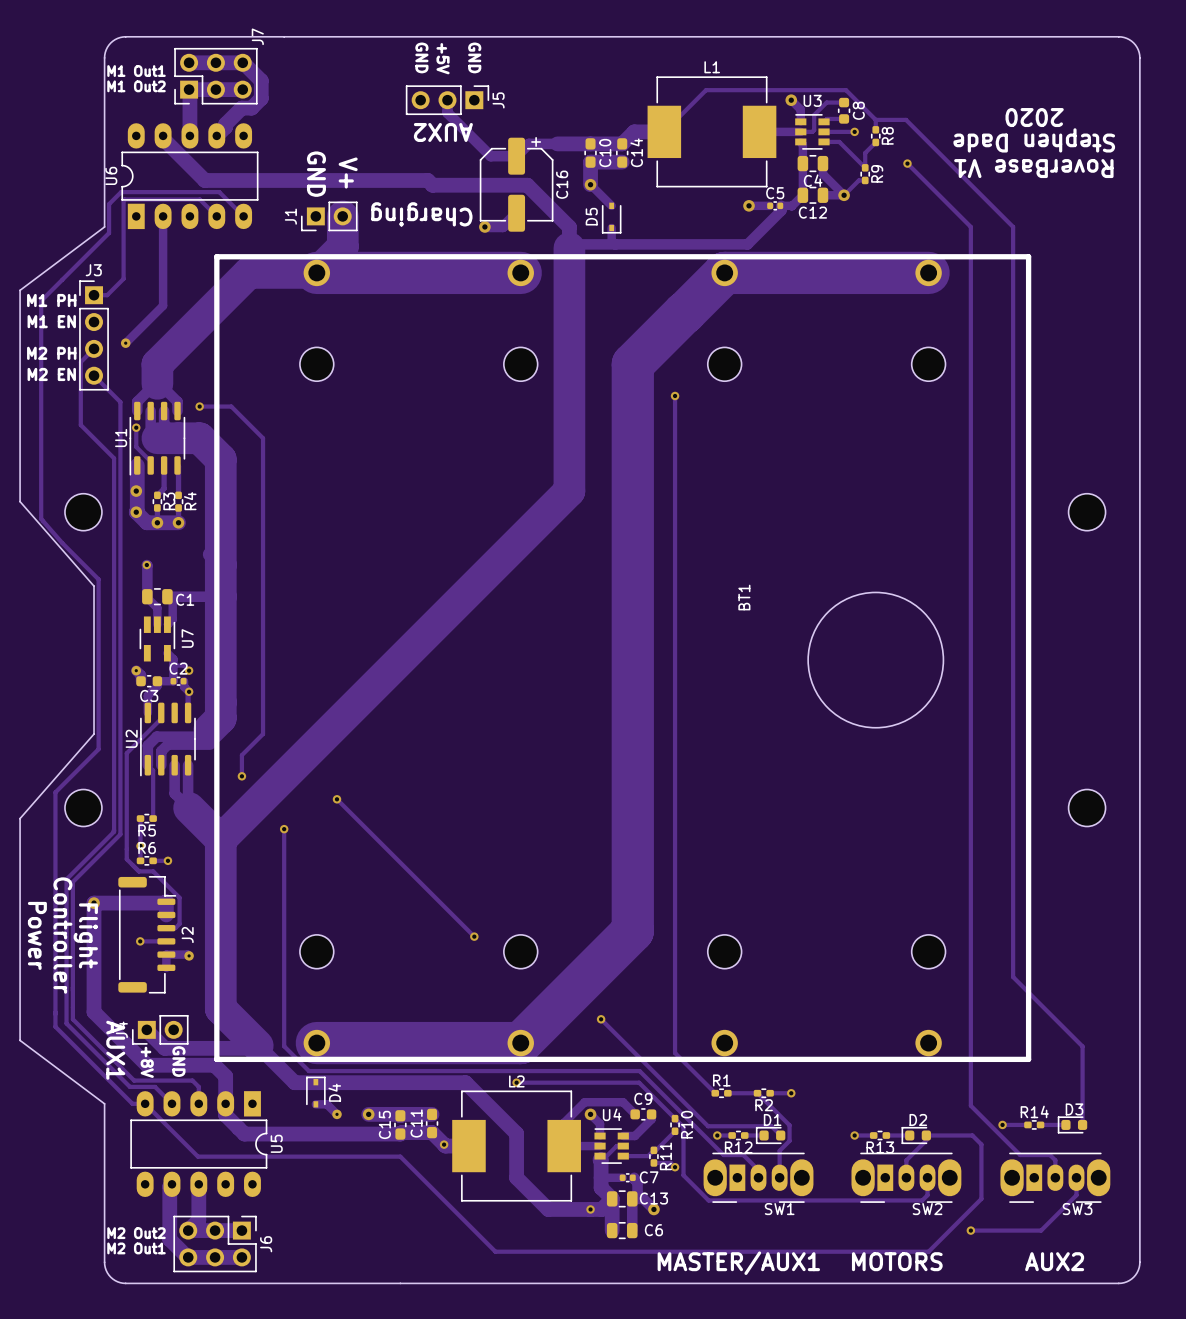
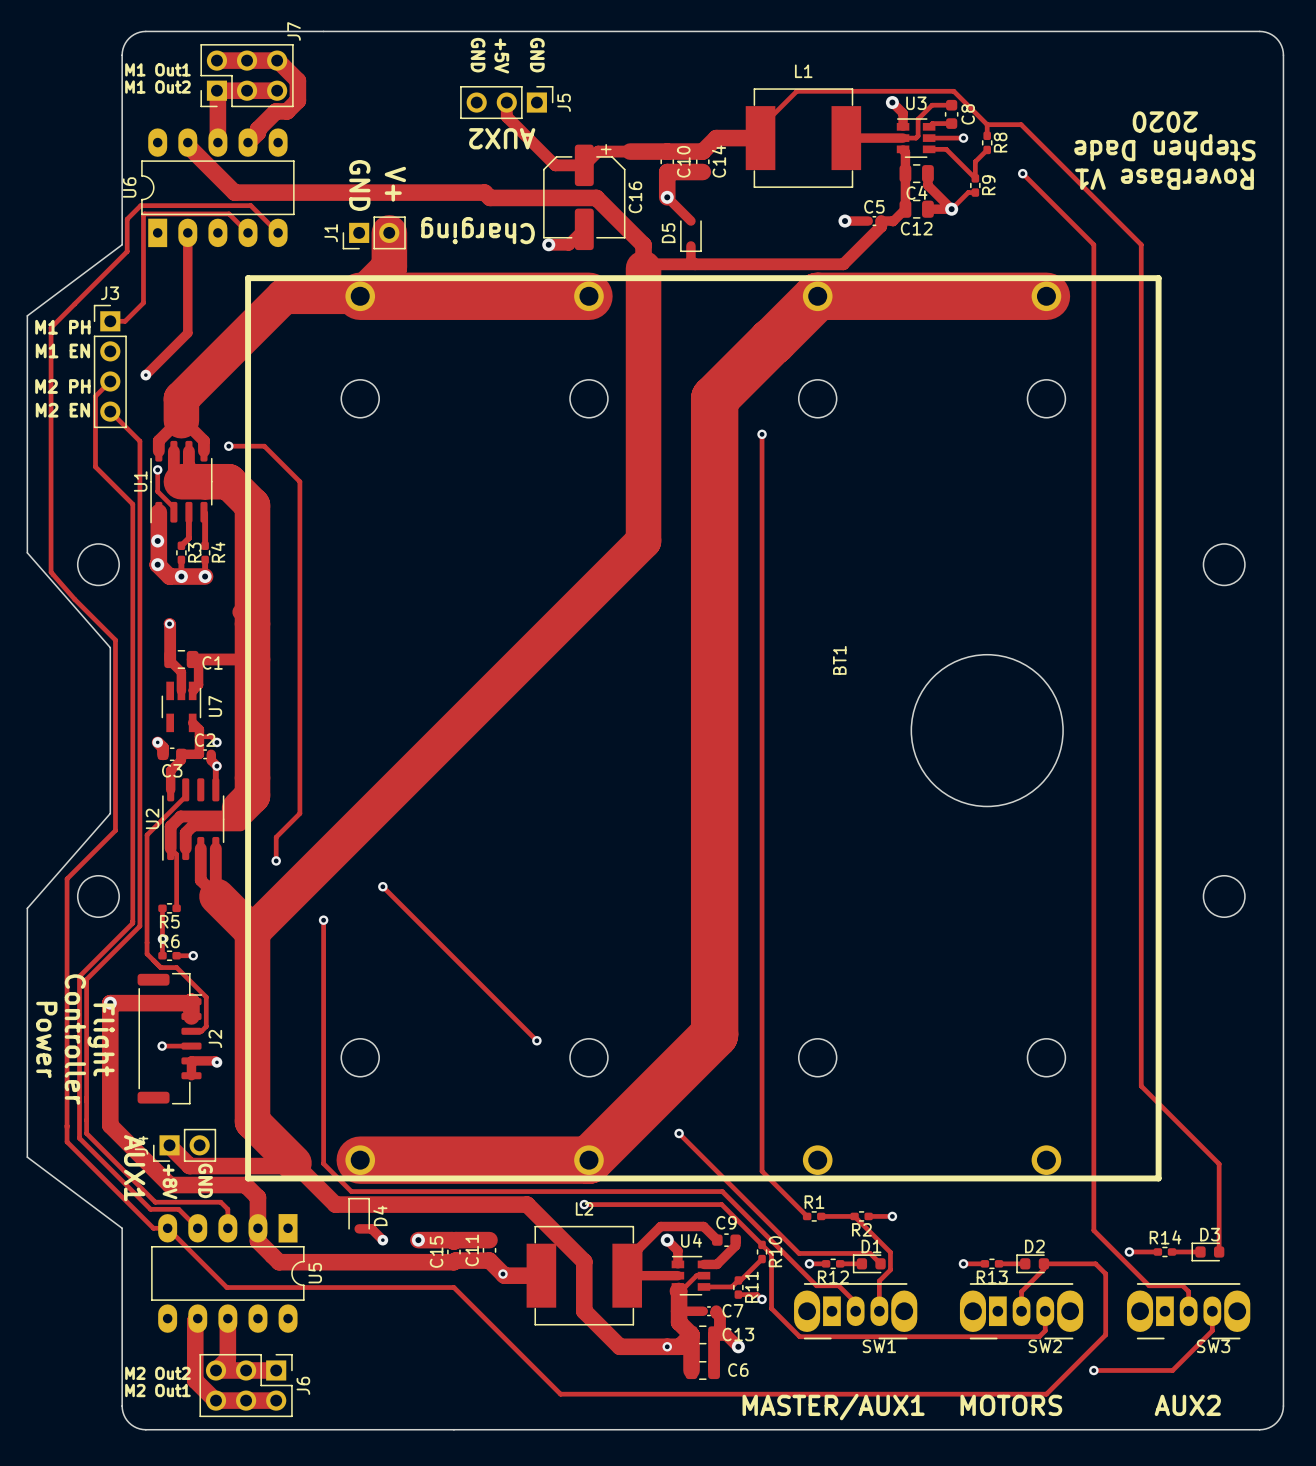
L1 footprint: [647, 76, 777, 188] -> [745, 88, 862, 188]
L2 footprint: [452, 1090, 581, 1202] -> [526, 1225, 643, 1326]

